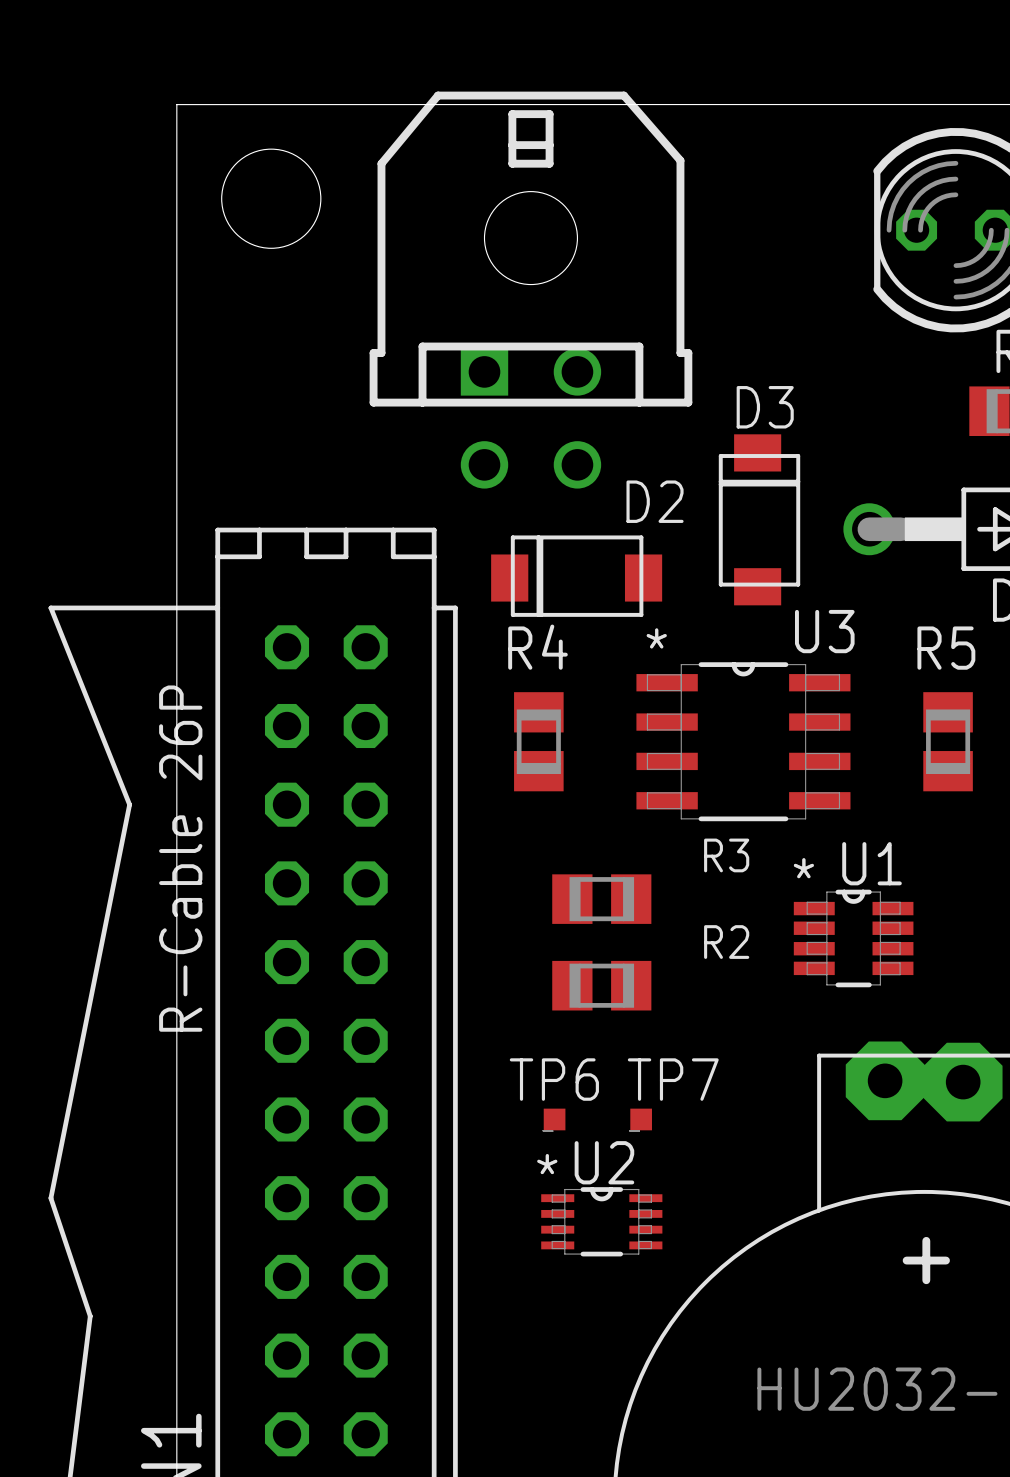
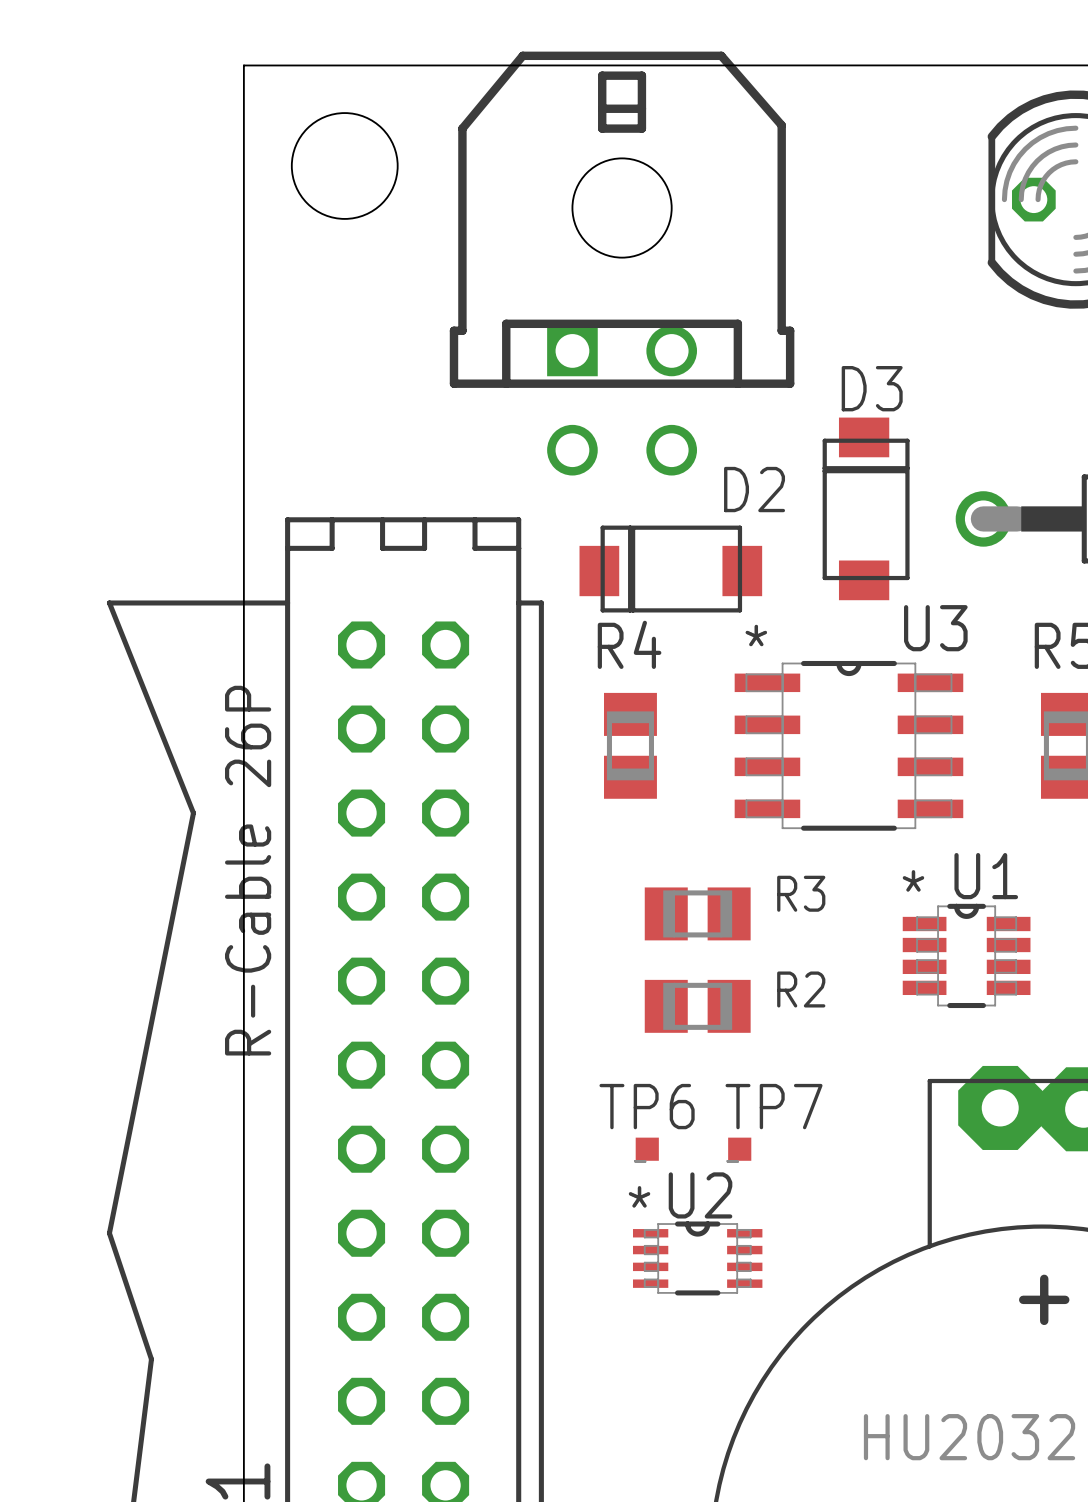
R3 name position: R3 (726, 855) -> R3 (801, 893)
R2 name position: R2 (726, 942) -> R2 (801, 989)

